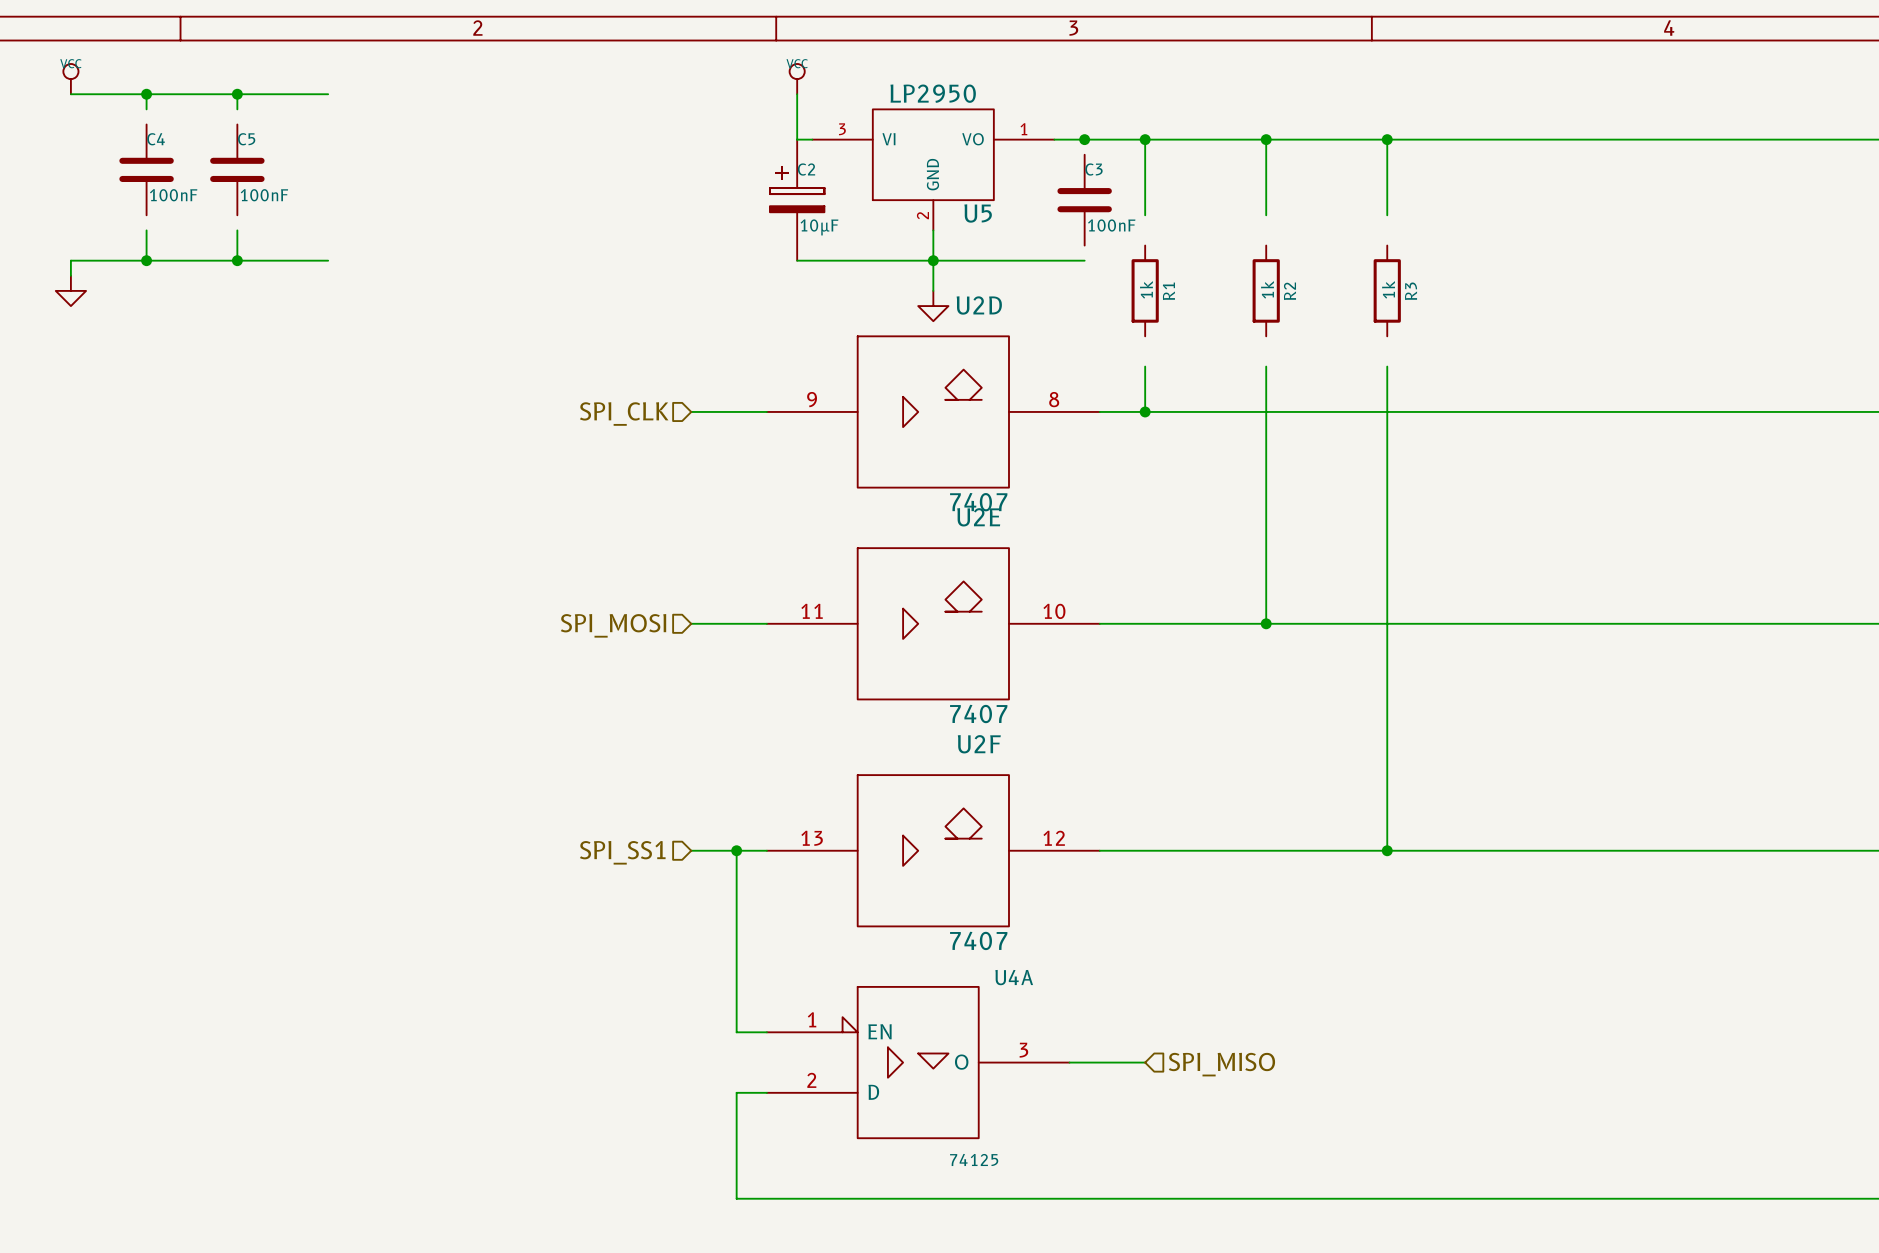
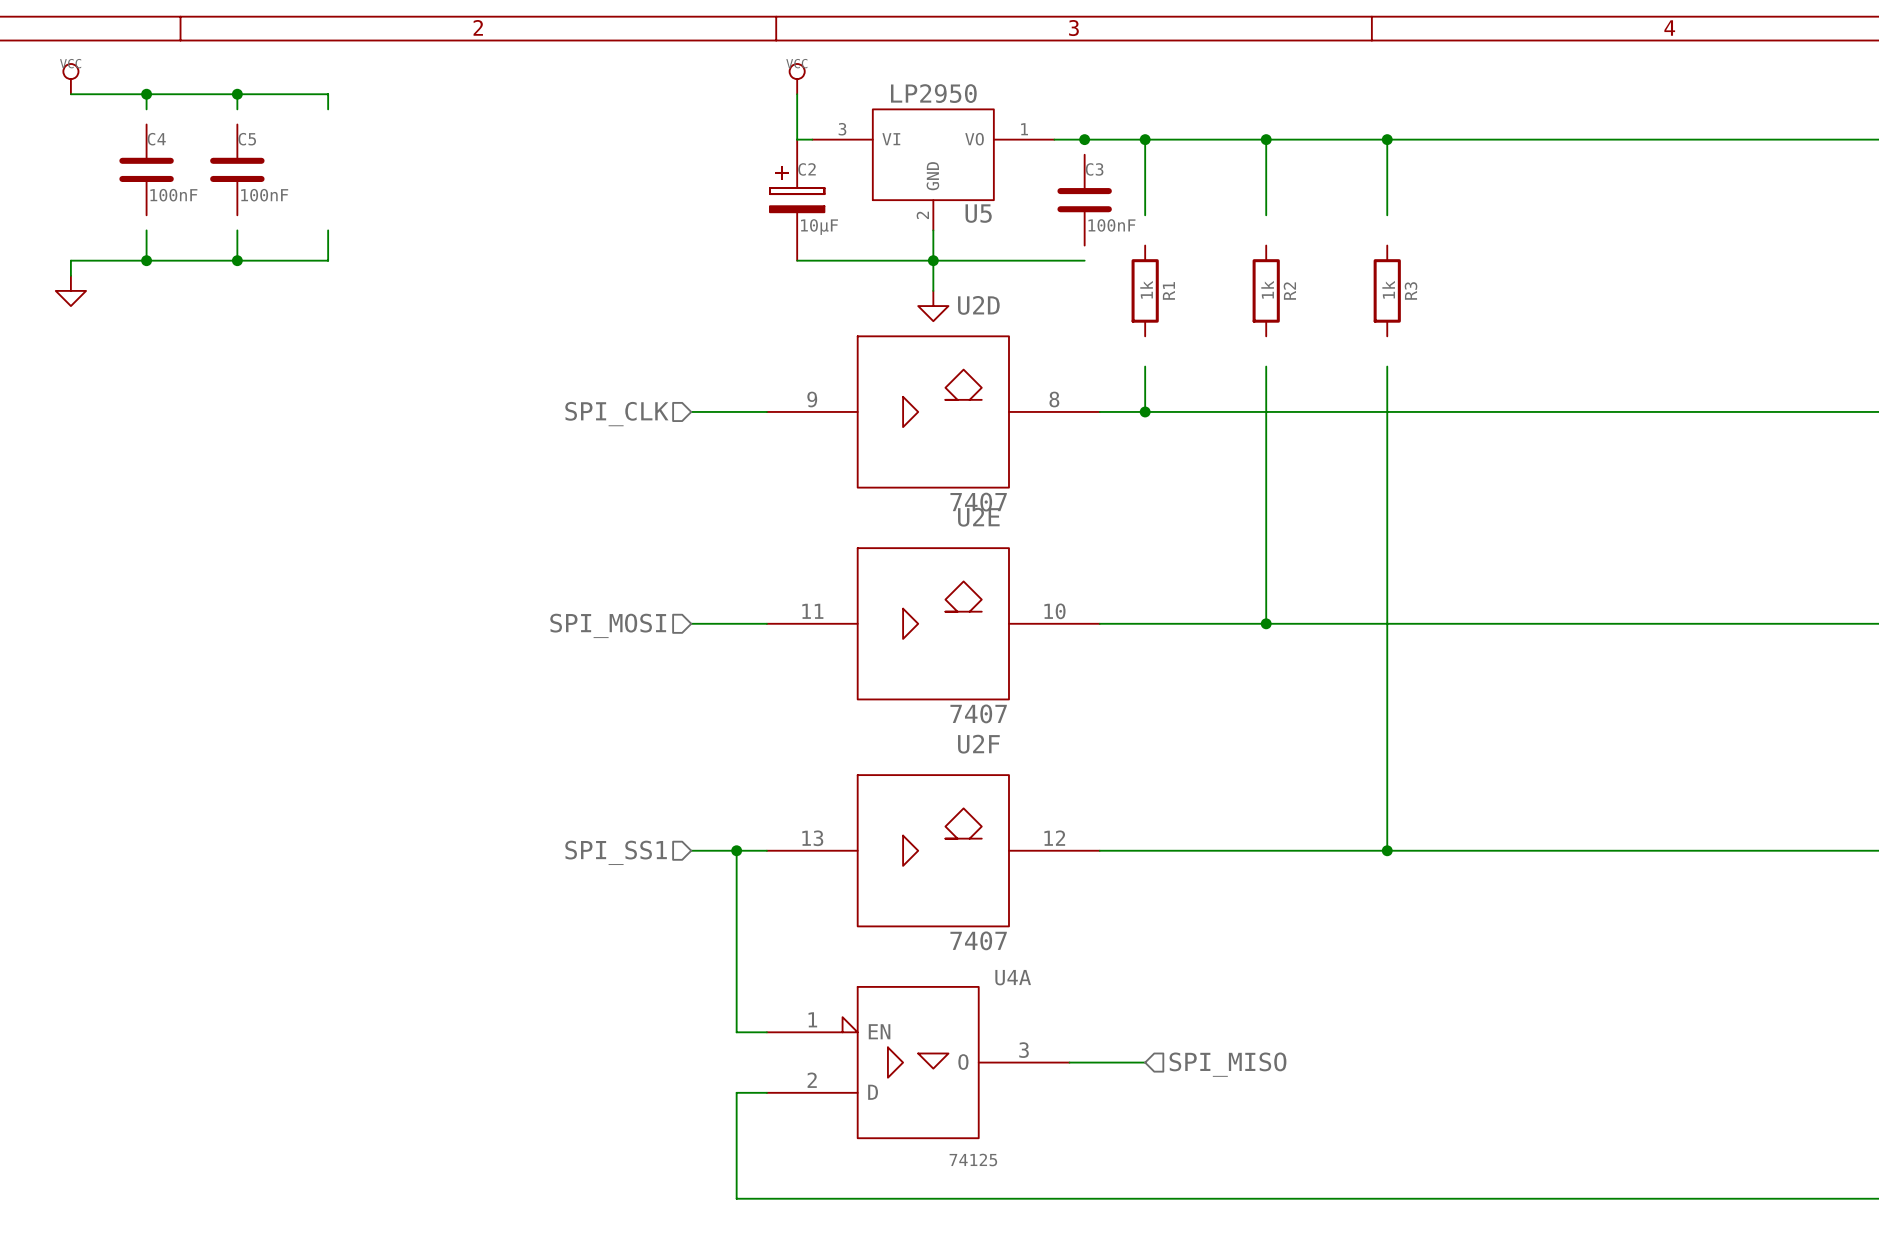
wire: none -> (328, 94) (328, 109)
wire: none -> (328, 230) (328, 260)

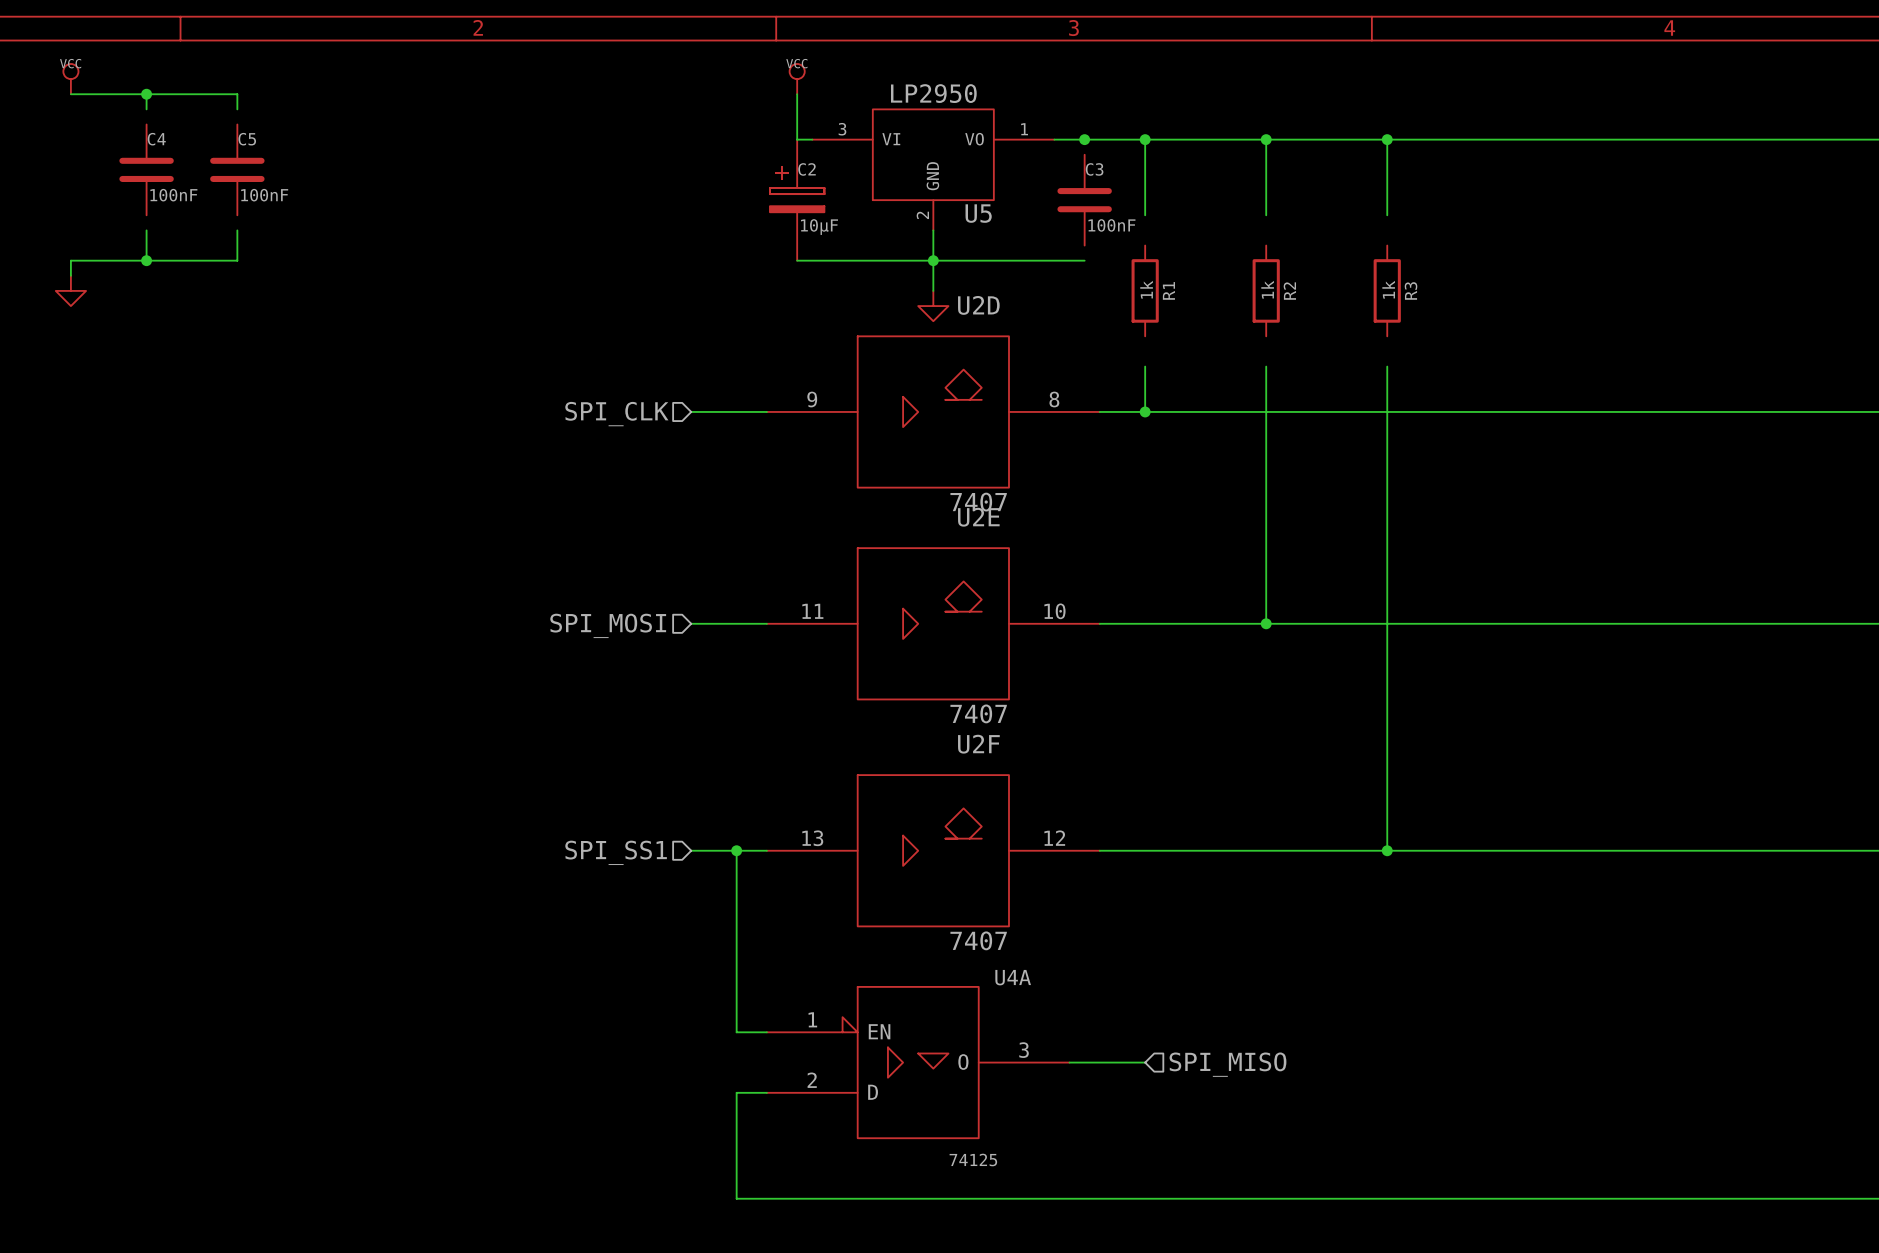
wire: (237, 94) (328, 94) (328, 109) -> none
junction: (237, 94) -> none
wire: (328, 230) (328, 260) (237, 260) -> none
junction: (237, 260) -> none

